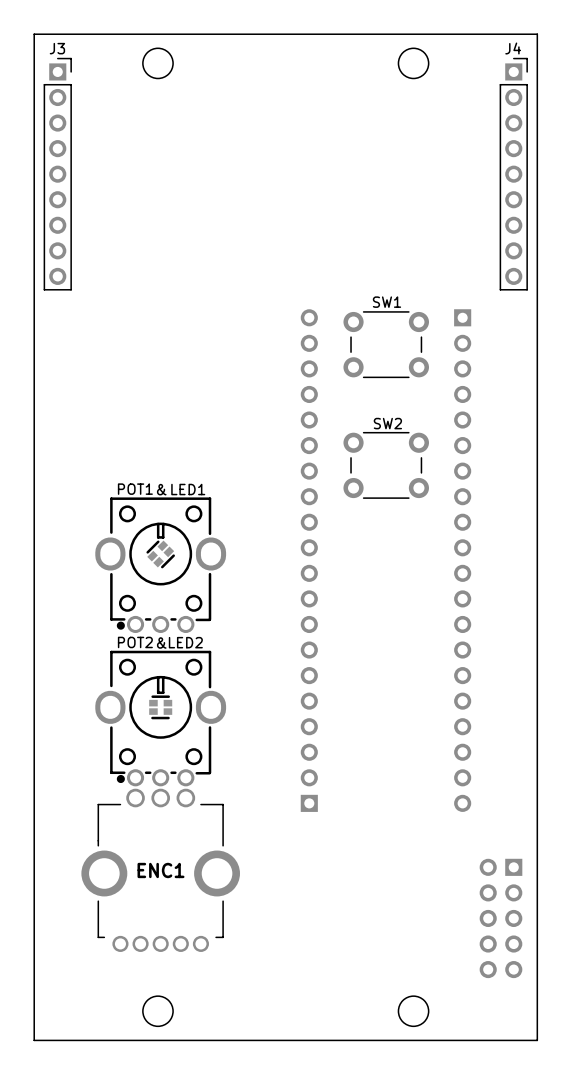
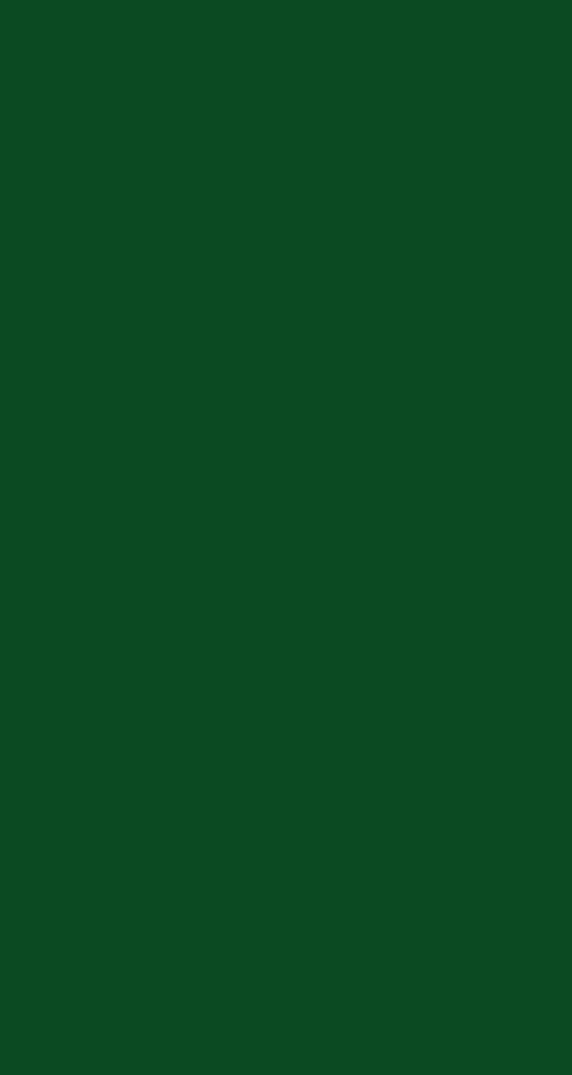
board edge: (34, 34) (537, 34) (537, 1040) (34, 1040) (34, 34) -> none
round board edge: [142, 47, 174, 79] -> none
round board edge: [397, 47, 430, 79] -> none
J3: (57, 174) -> none
J4: (513, 174) -> none
SW1: (386, 344) -> none
SW2: (386, 465) -> none
text: & (161, 489) -> none
LED1: (160, 554) -> none
part: (309, 560) -> none
part: (462, 560) -> none
POT1: (160, 565) -> none
text: & (161, 642) -> none
LED2: (160, 707) -> none
POT2: (160, 718) -> none
ENC1: (160, 870) -> none
part: (500, 918) -> none
round board edge: [142, 995, 174, 1027] -> none
round board edge: [397, 995, 430, 1027] -> none

